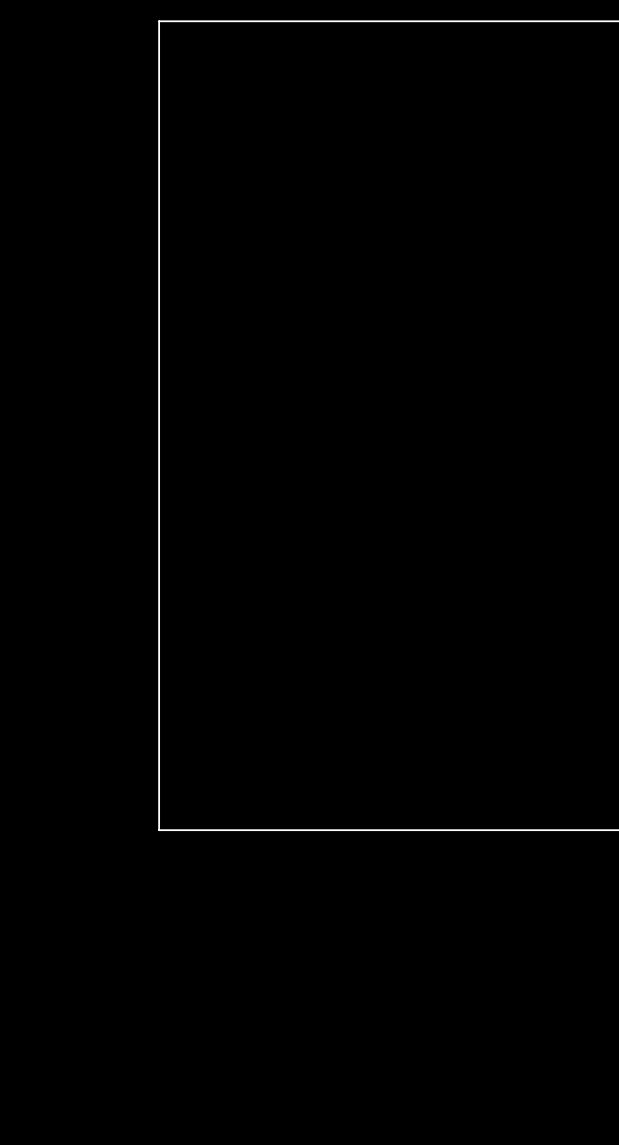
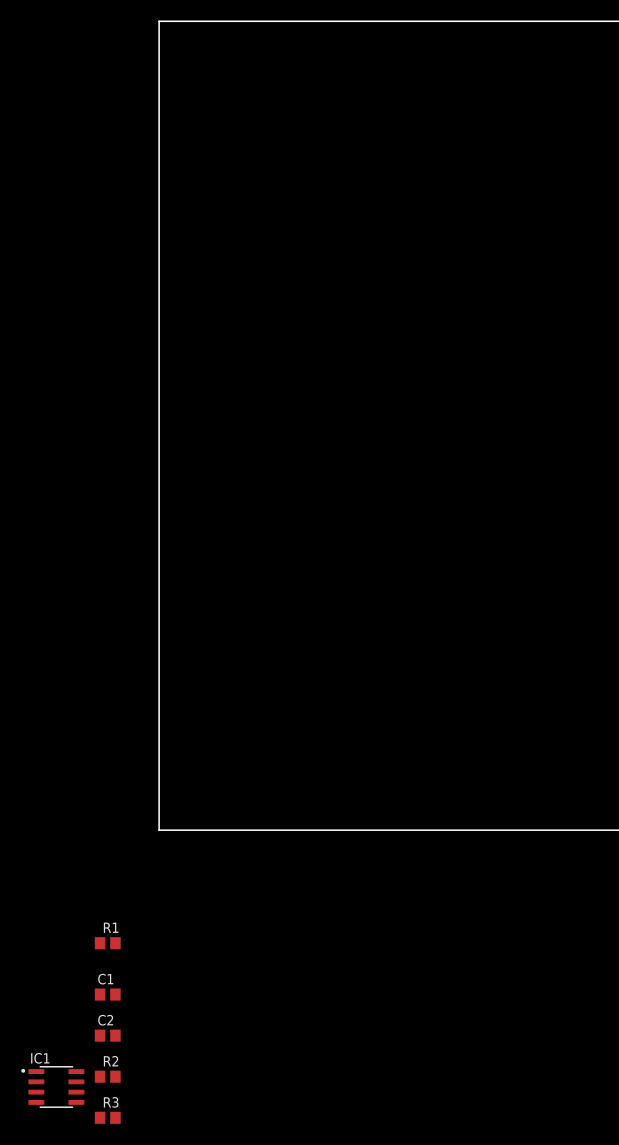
R1: none -> (107, 943)
C1: none -> (107, 994)
C2: none -> (107, 1035)
R2: none -> (107, 1076)
IC1: none -> (52, 1086)
R3: none -> (107, 1117)

